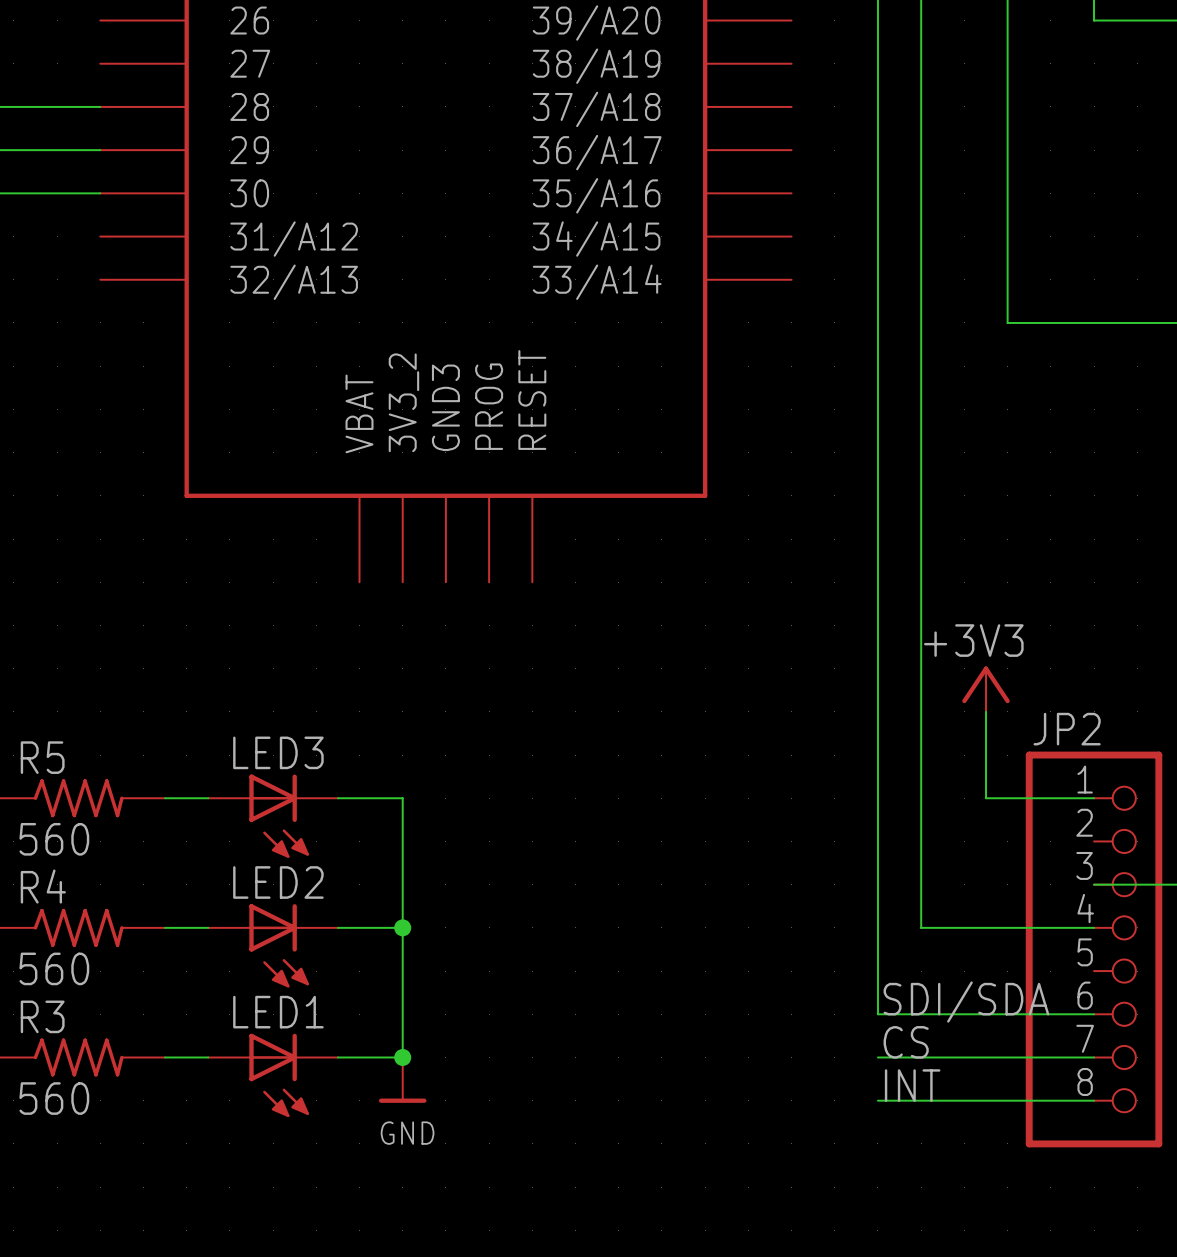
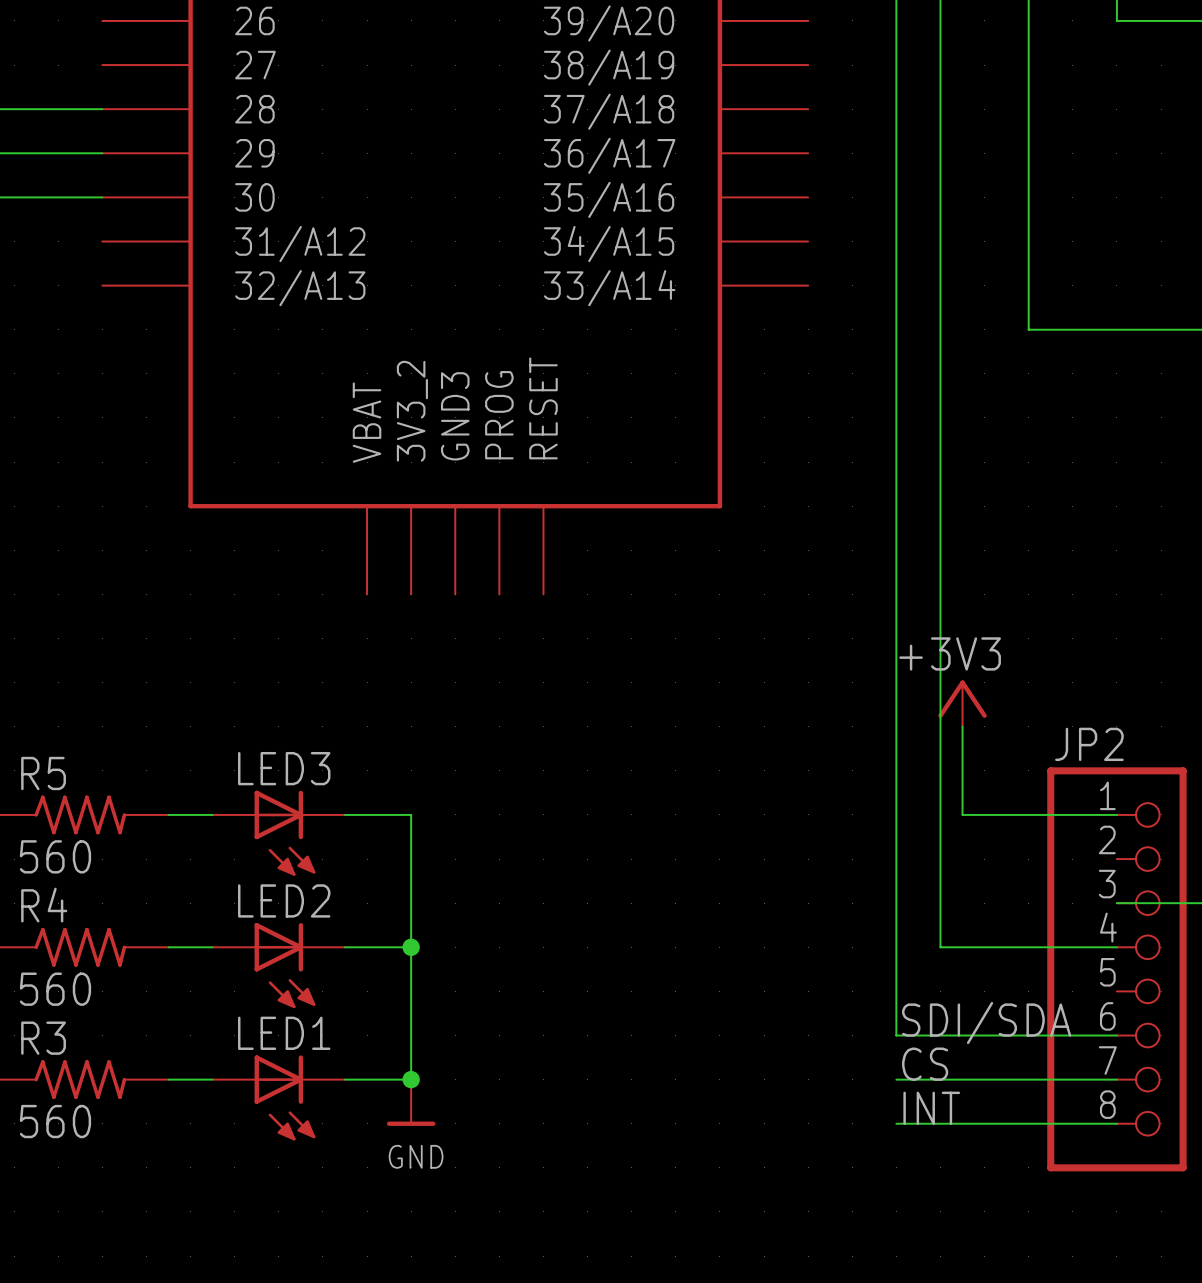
power symbol position: +3V3 (986, 689) -> +3V3 (962, 703)
wire: (986, 711) (986, 798) -> (962, 726) (962, 814) (1006, 814)

